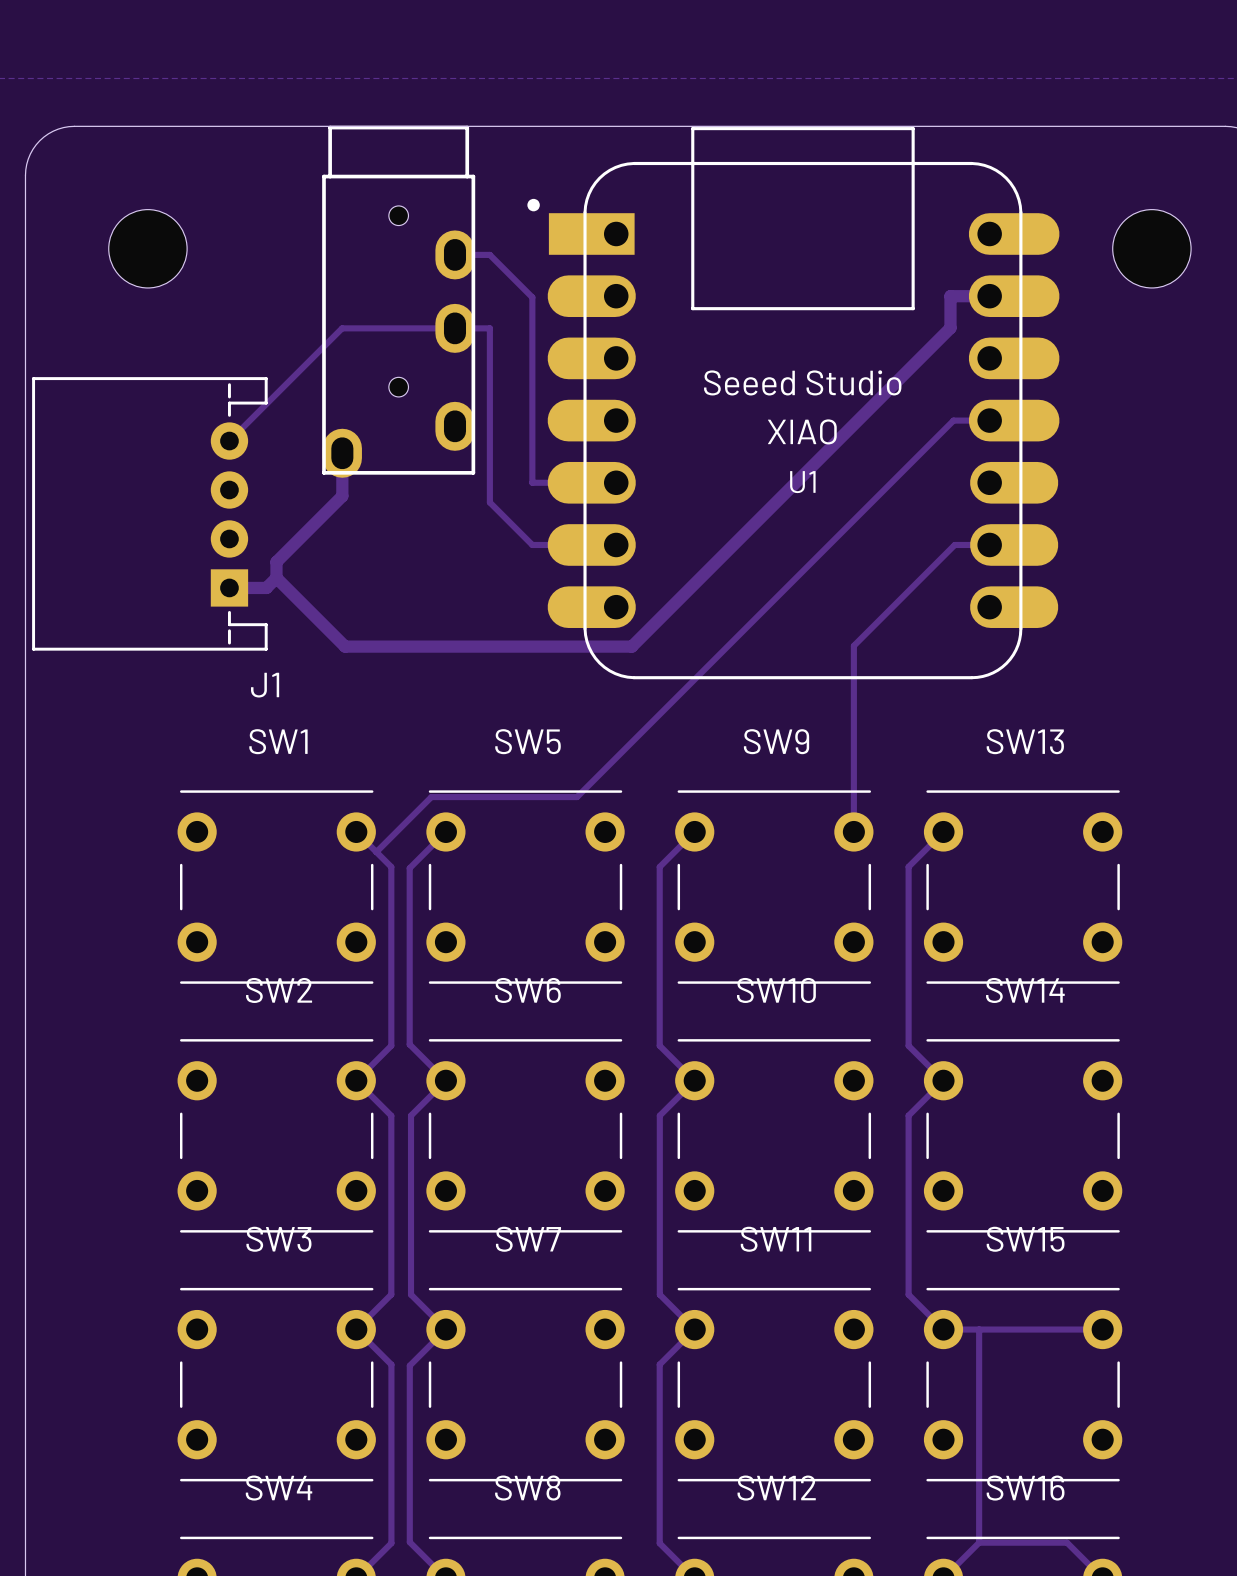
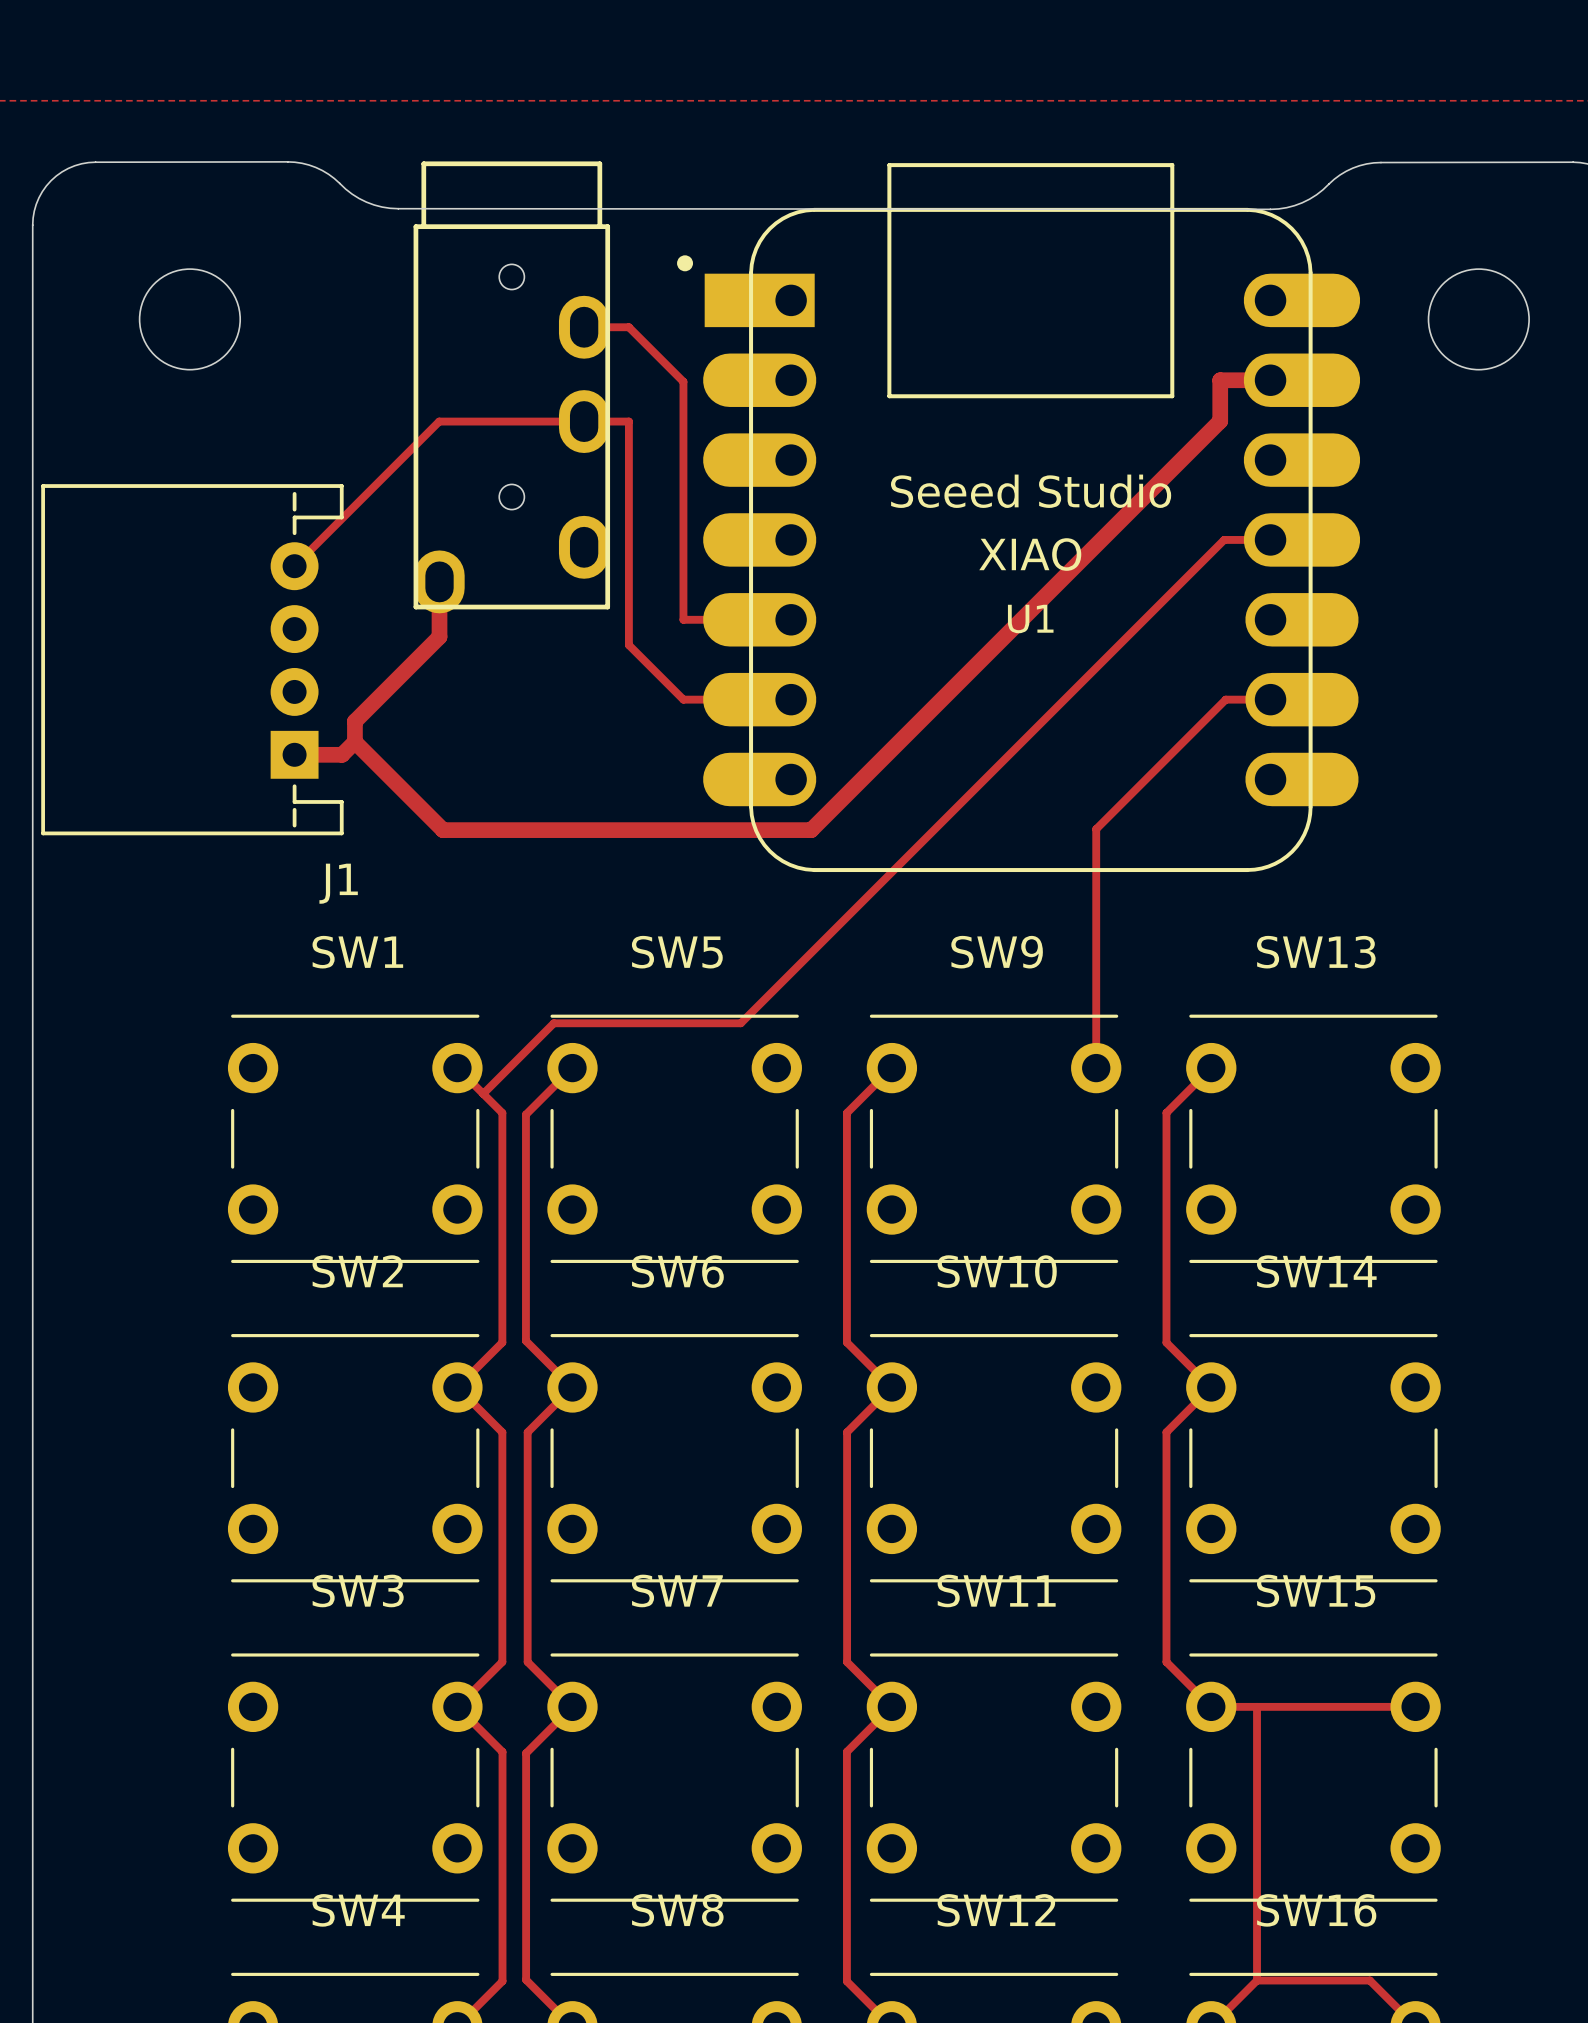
board edge: (74, 126) (1225, 126) -> (95, 162) (302, 163) (328, 174) (352, 194) (366, 202) (382, 207) (398, 208) (1270, 209) (1286, 207) (1302, 202) (1316, 194) (1340, 174) (1366, 163) (1573, 162)

